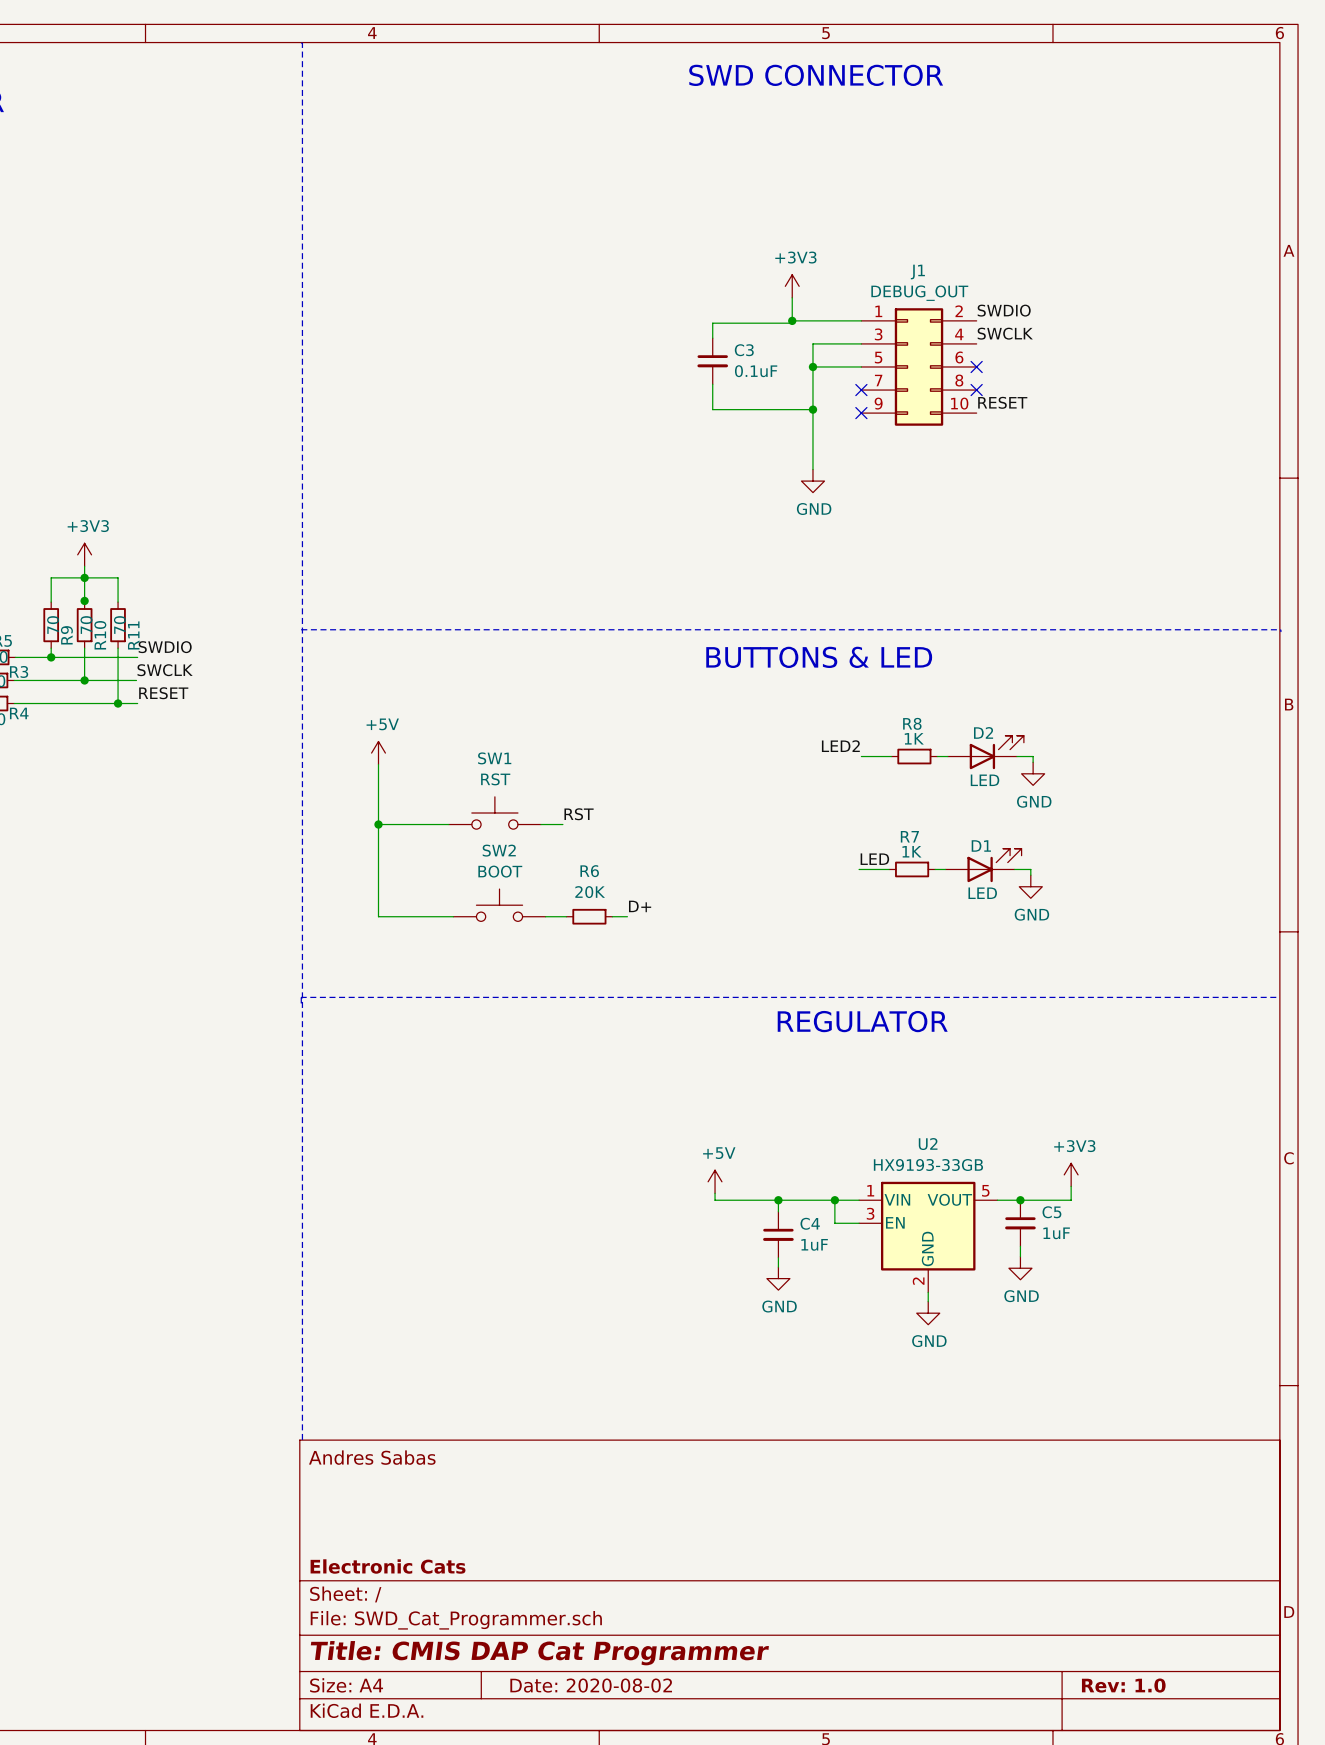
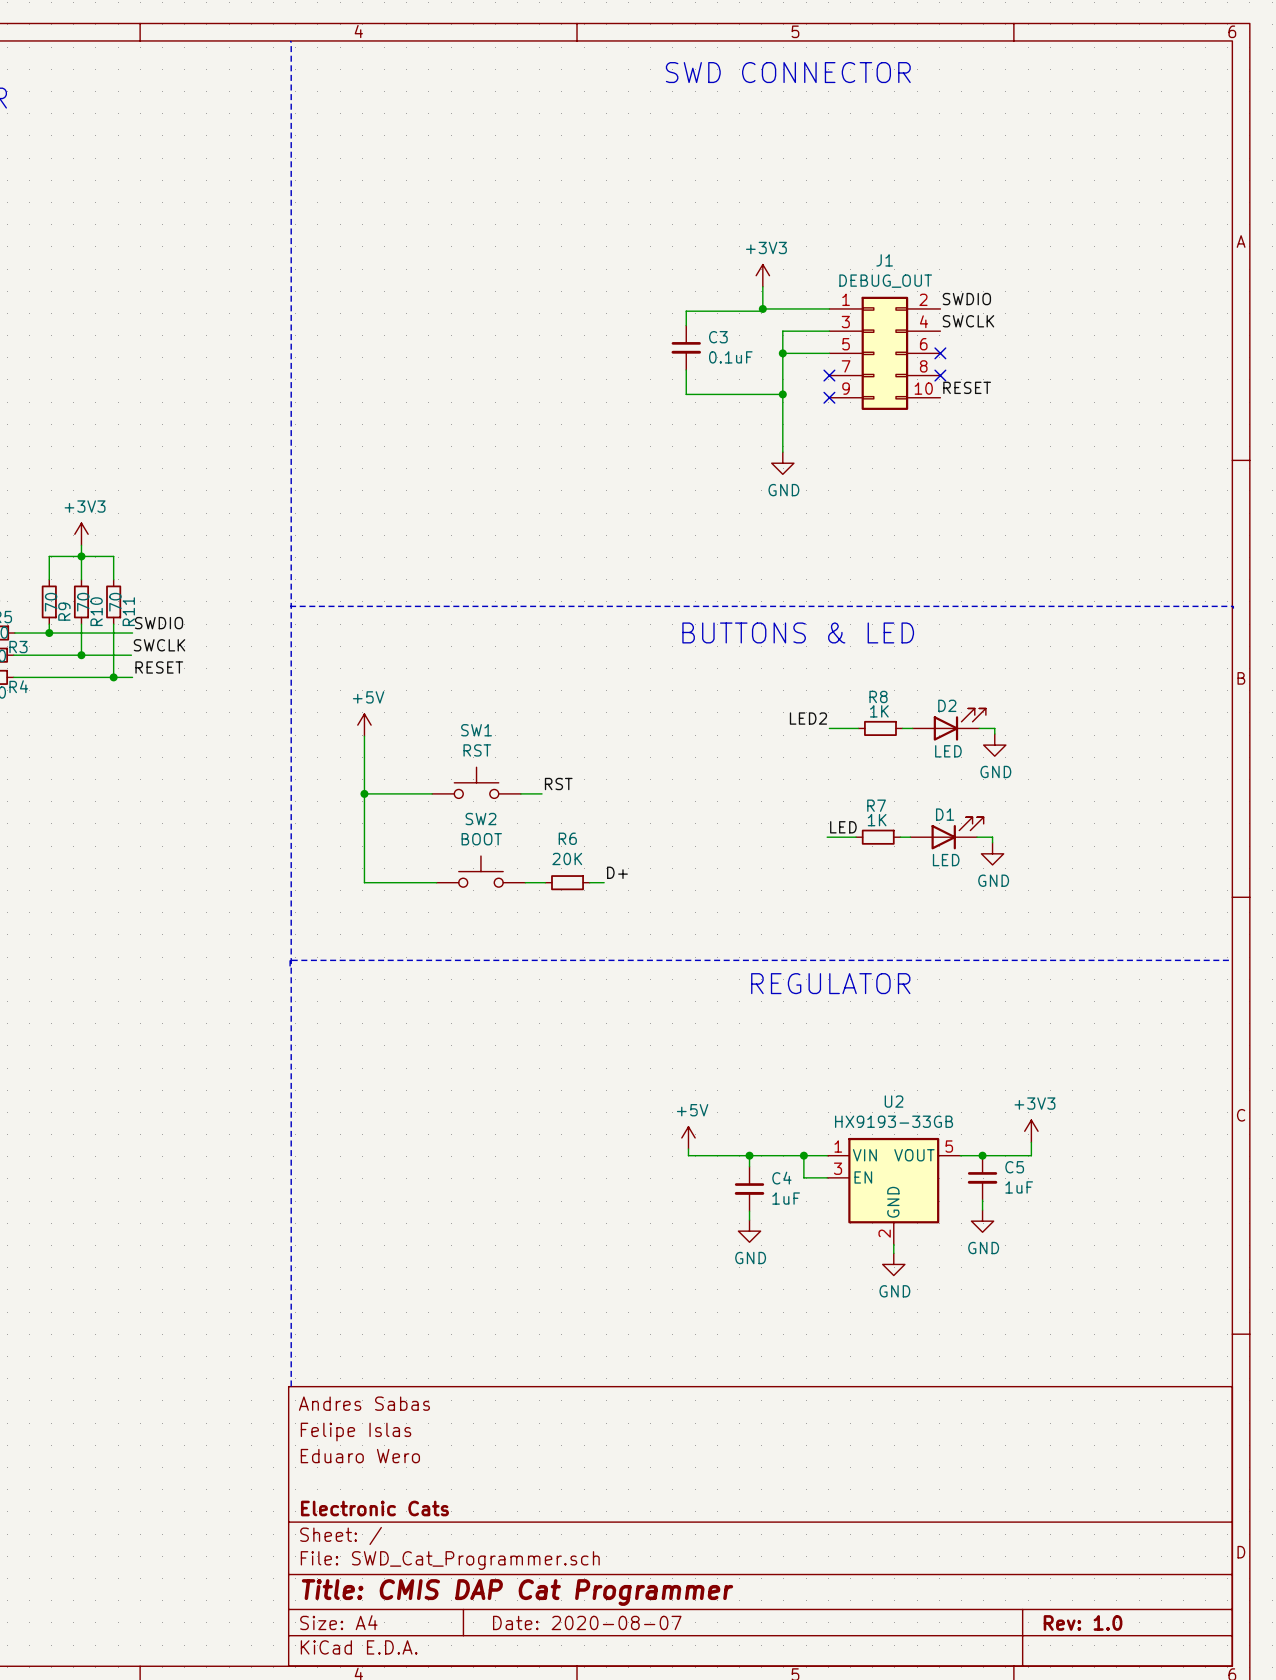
junction: (84, 600) -> none
title block: none -> Felipe Islas (356, 1432)
title block: none -> Eduaro Wero (360, 1456)
title block: Date: 2020-08-02 (591, 1685) -> Date: 2020-08-07 (587, 1622)

